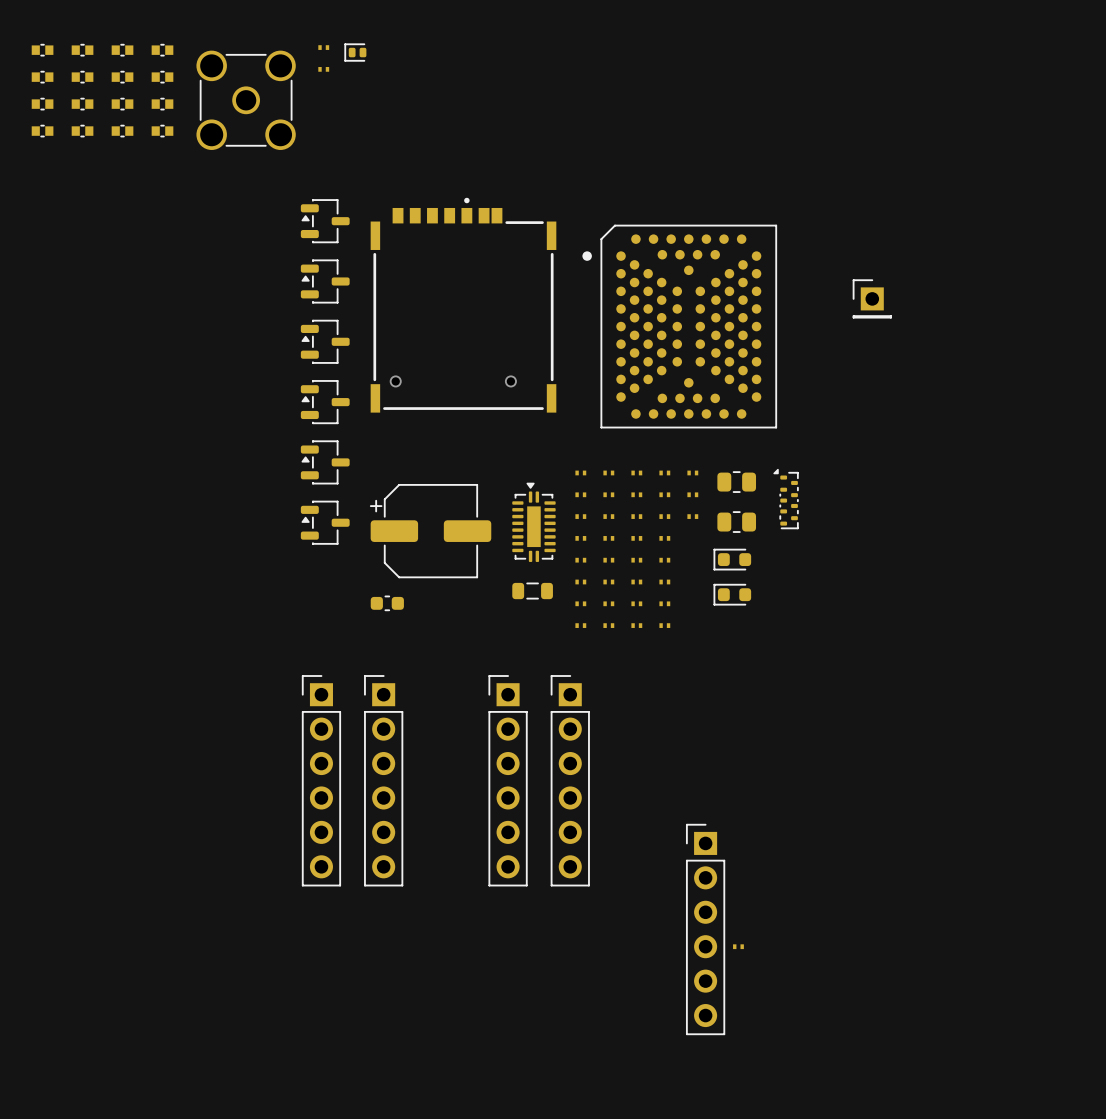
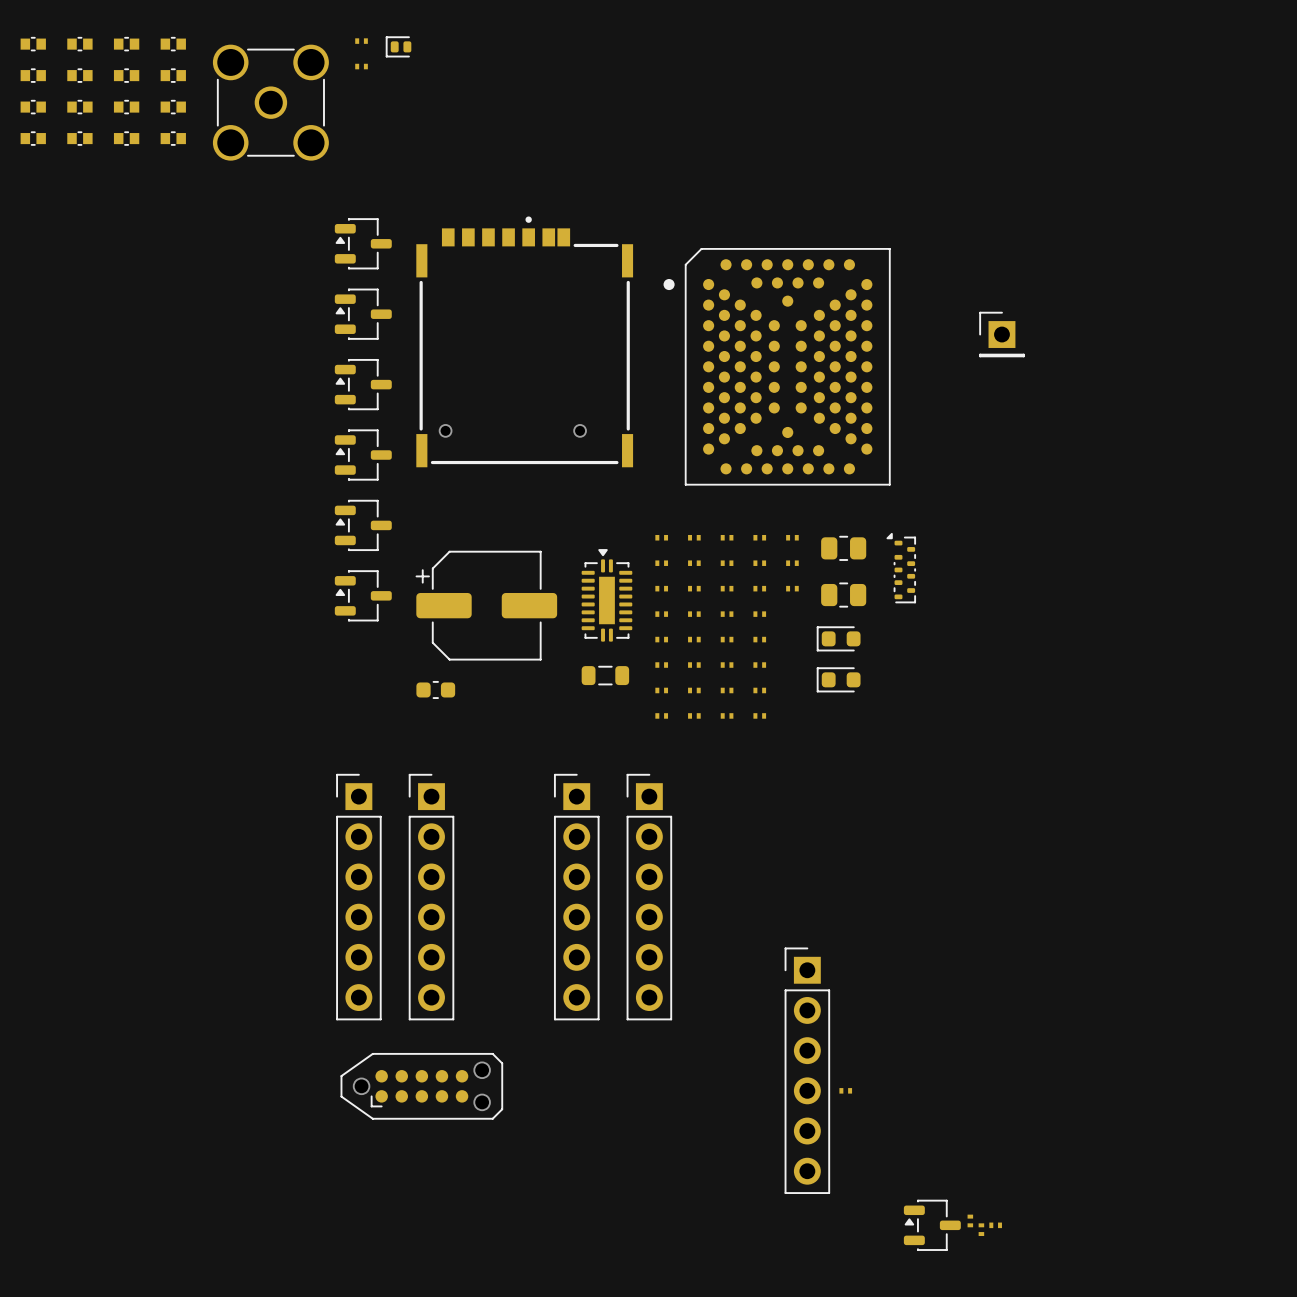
part: none -> (421, 1086)
part: none -> (970, 1220)
part: none -> (932, 1225)
part: none -> (995, 1225)
part: none -> (981, 1229)

